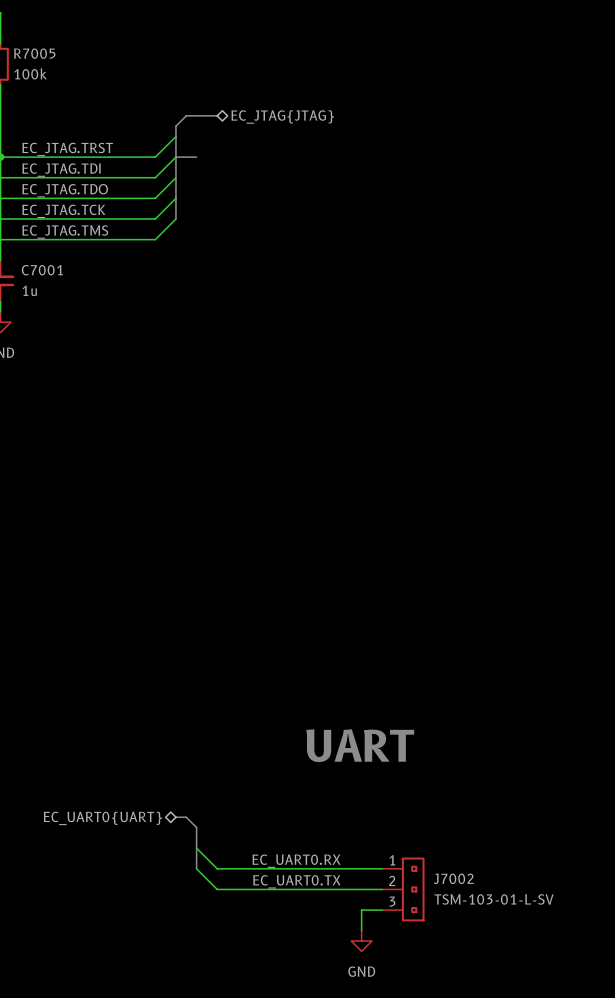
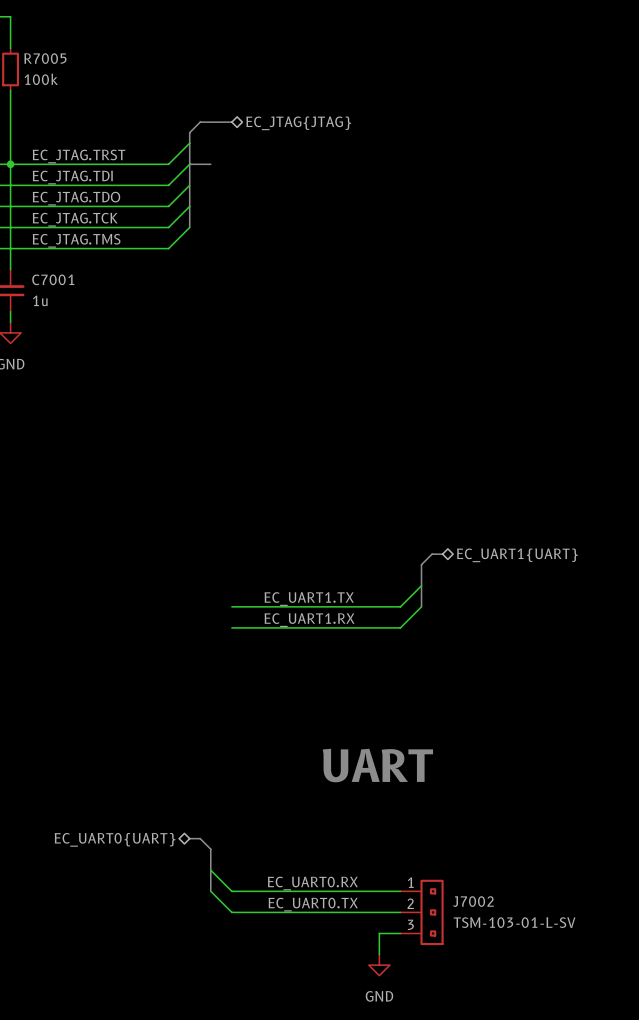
bus: none -> (442, 554) (432, 554) (421, 564) (421, 606)
hierarchical label: none -> EC_UART1{UART} (517, 555)
wire: none -> (421, 585) (400, 606) (231, 606)
label: none -> EC_UART1.TX (309, 599)
wire: none -> (421, 606) (400, 627) (231, 627)
label: none -> EC_UART1.RX (309, 620)

